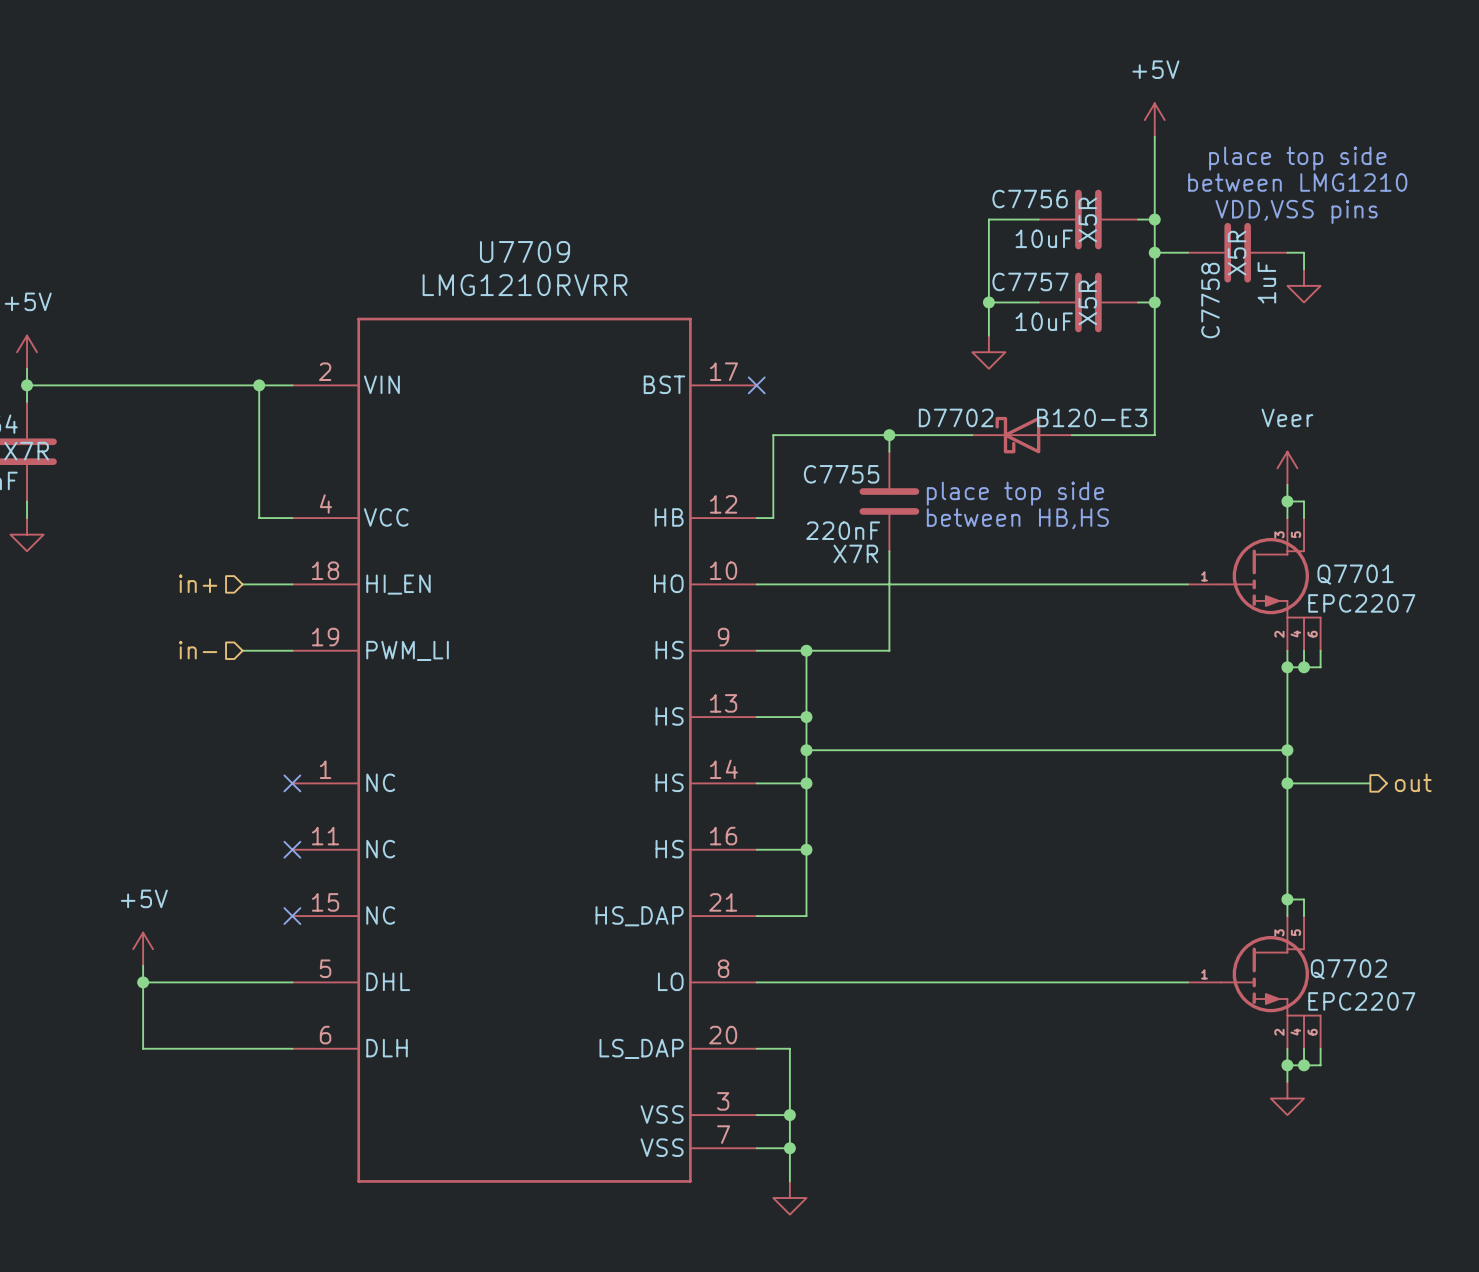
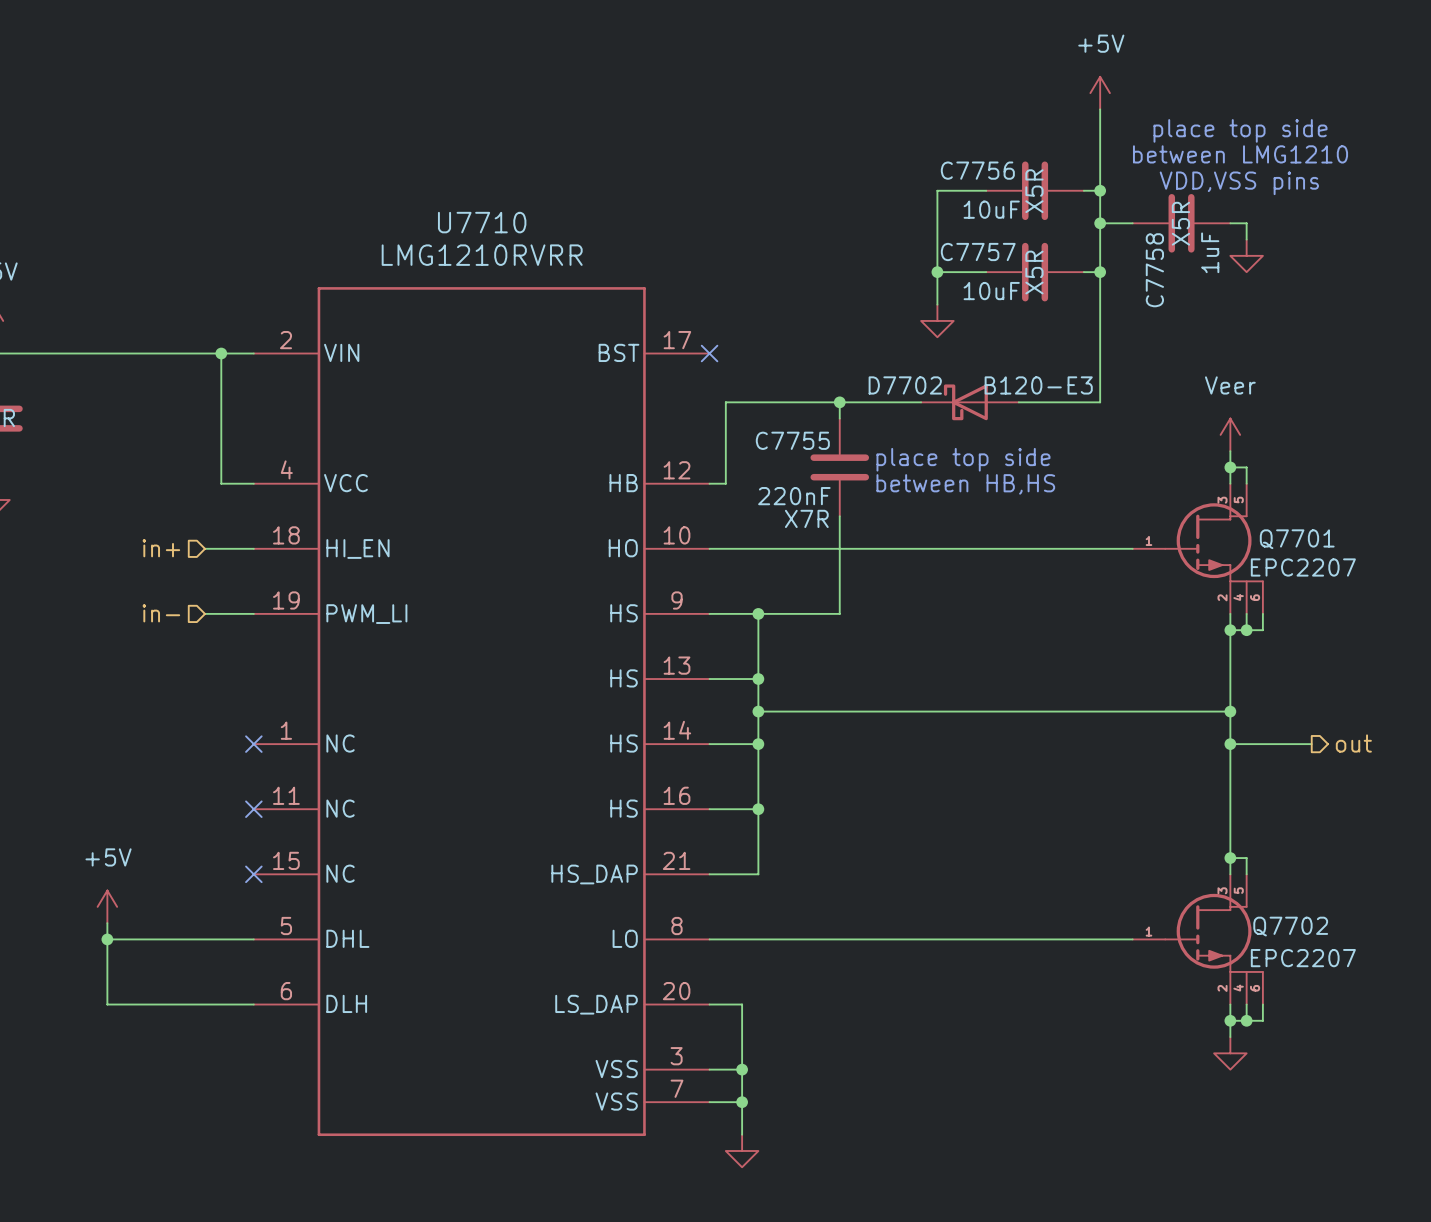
U7709 name: U7709 (525, 251) -> U7710 (482, 222)

